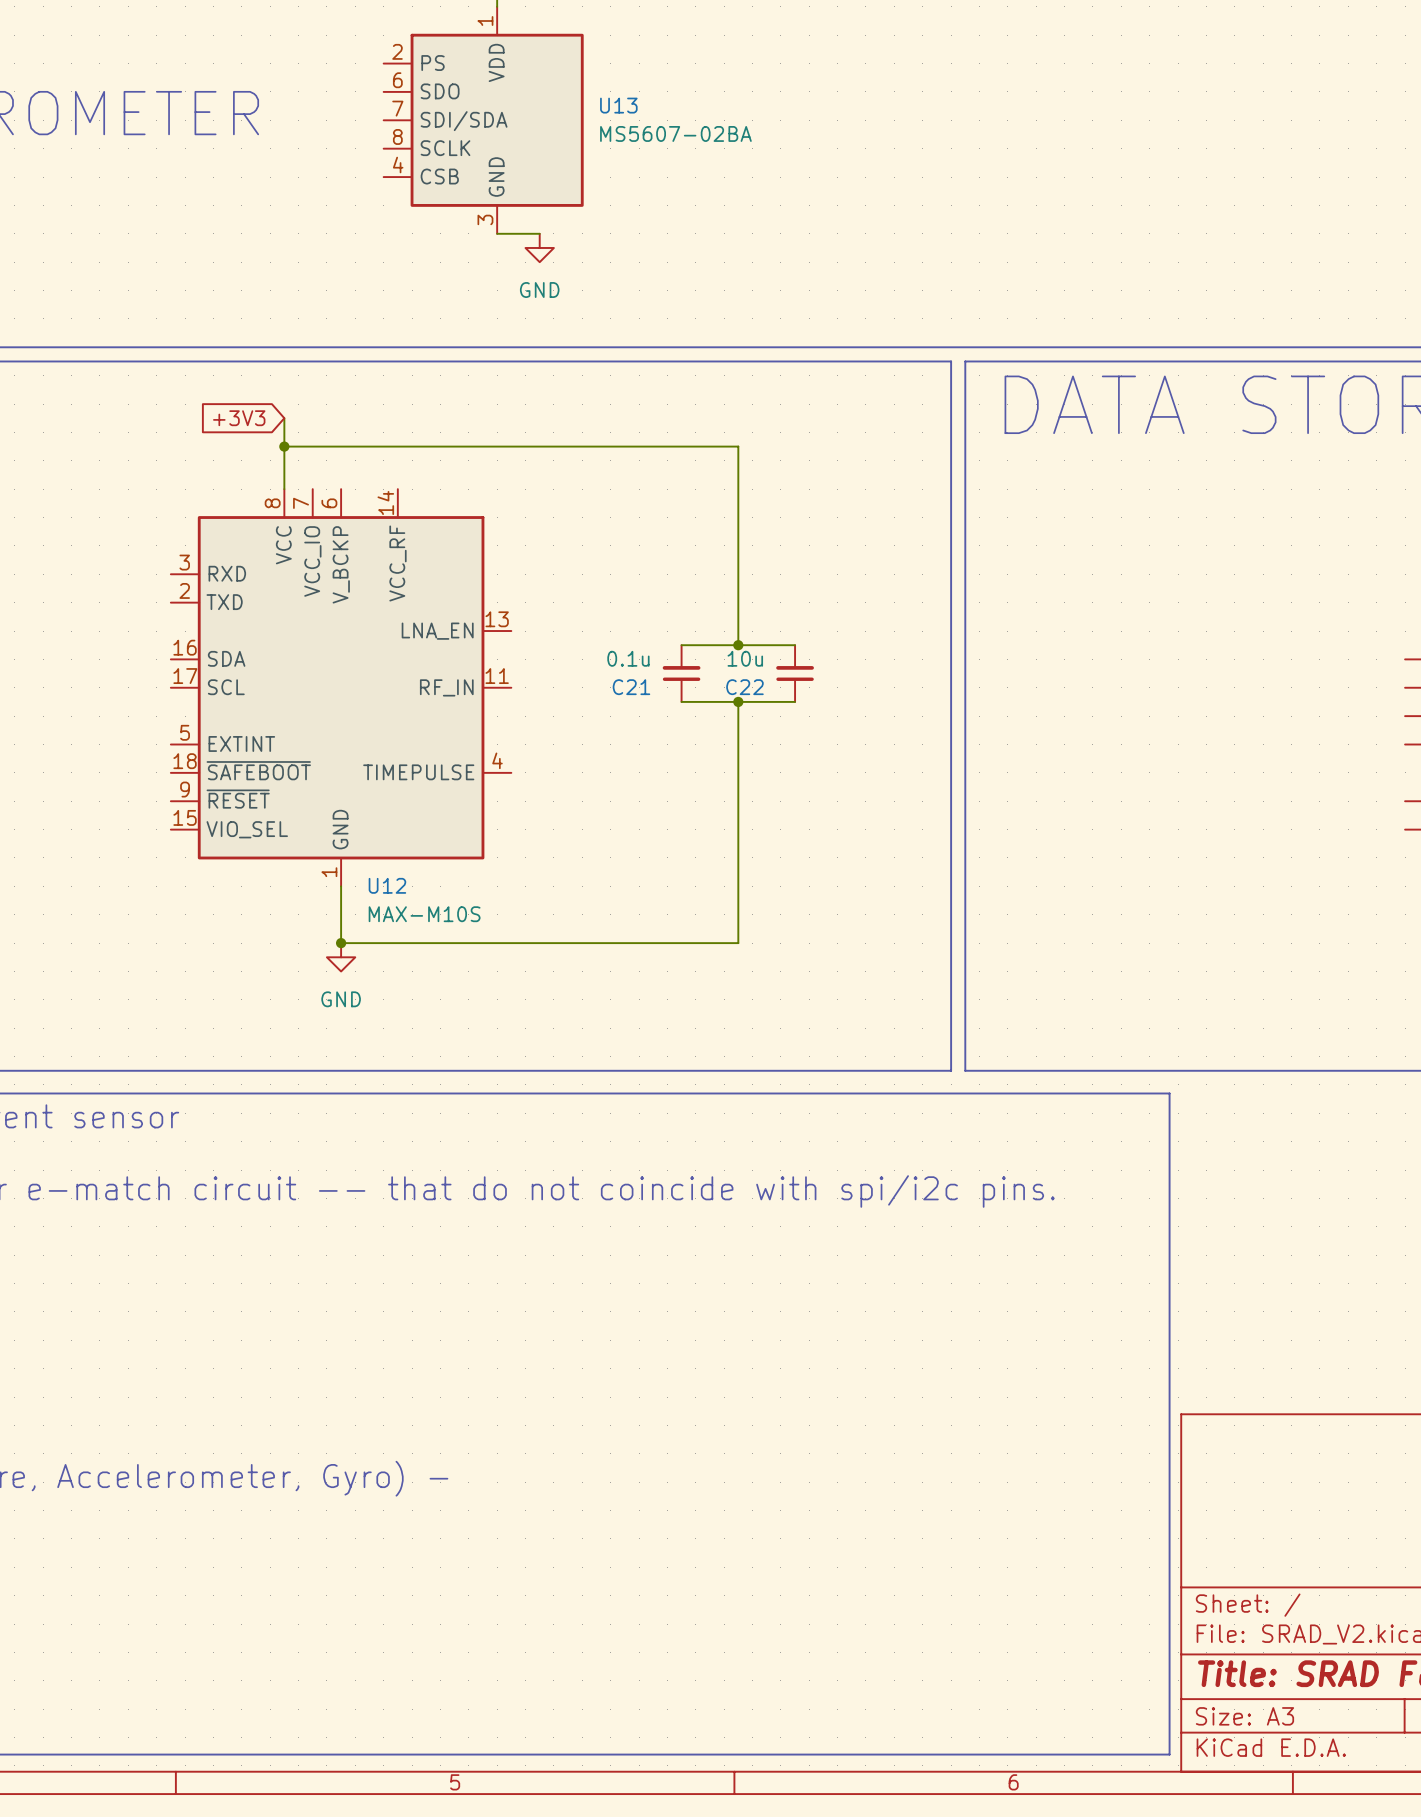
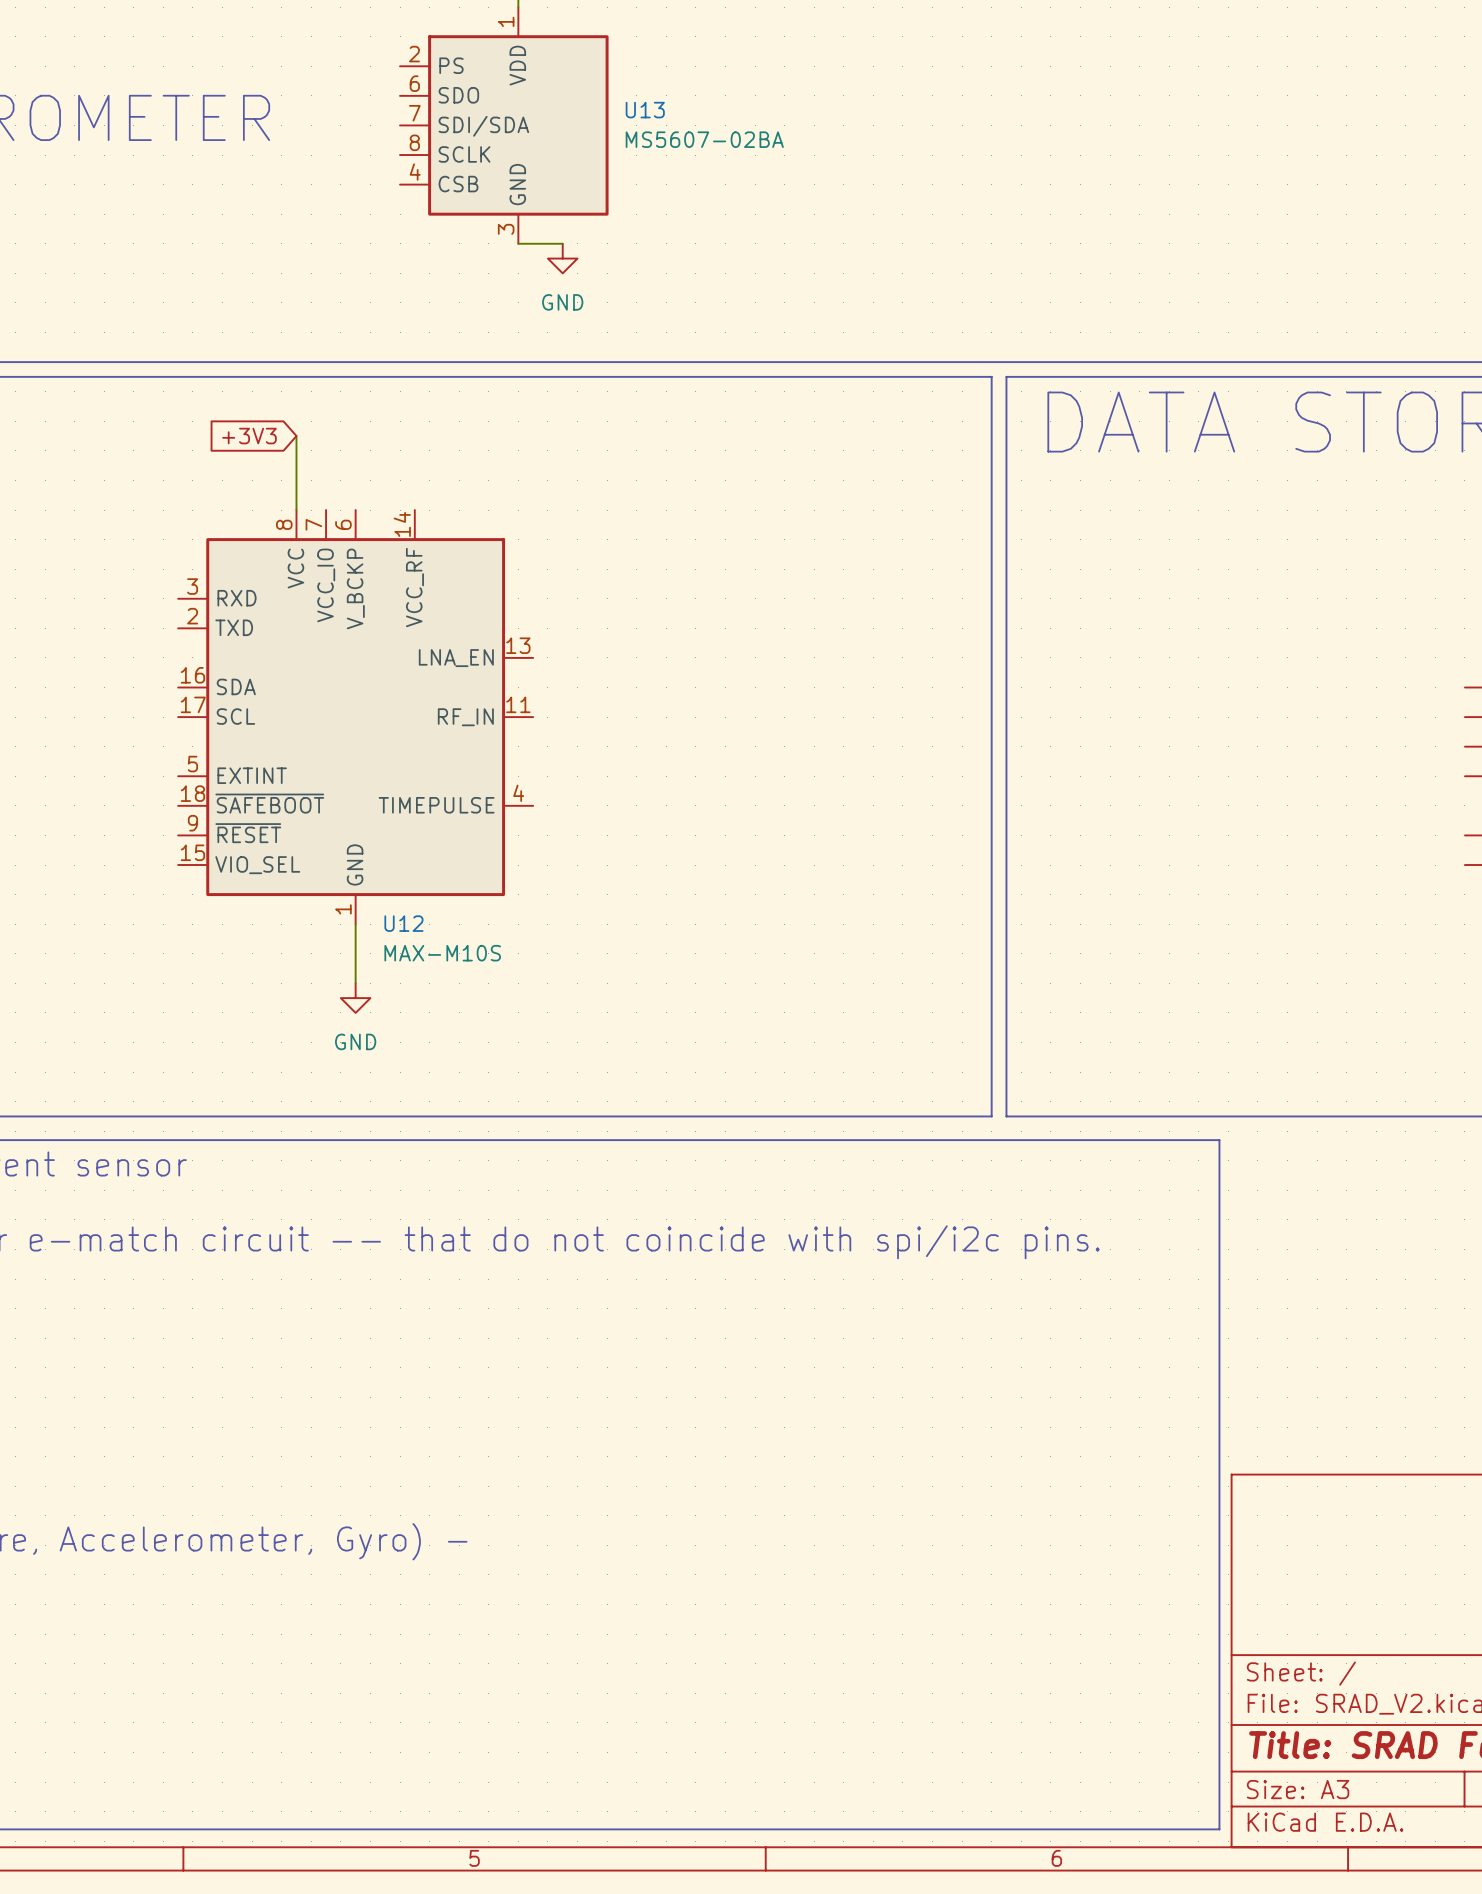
wire: (284, 446) (738, 446) (738, 645) -> none
junction: (284, 446) -> none
wire: (681, 645) (795, 645) -> none
junction: (738, 645) -> none
C21: 0.1u (681, 673) -> none
C22: 10u (795, 673) -> none
wire: (681, 701) (795, 701) -> none
wire: (738, 701) (738, 943) (341, 943) -> none
junction: (738, 701) -> none
junction: (341, 943) -> none

